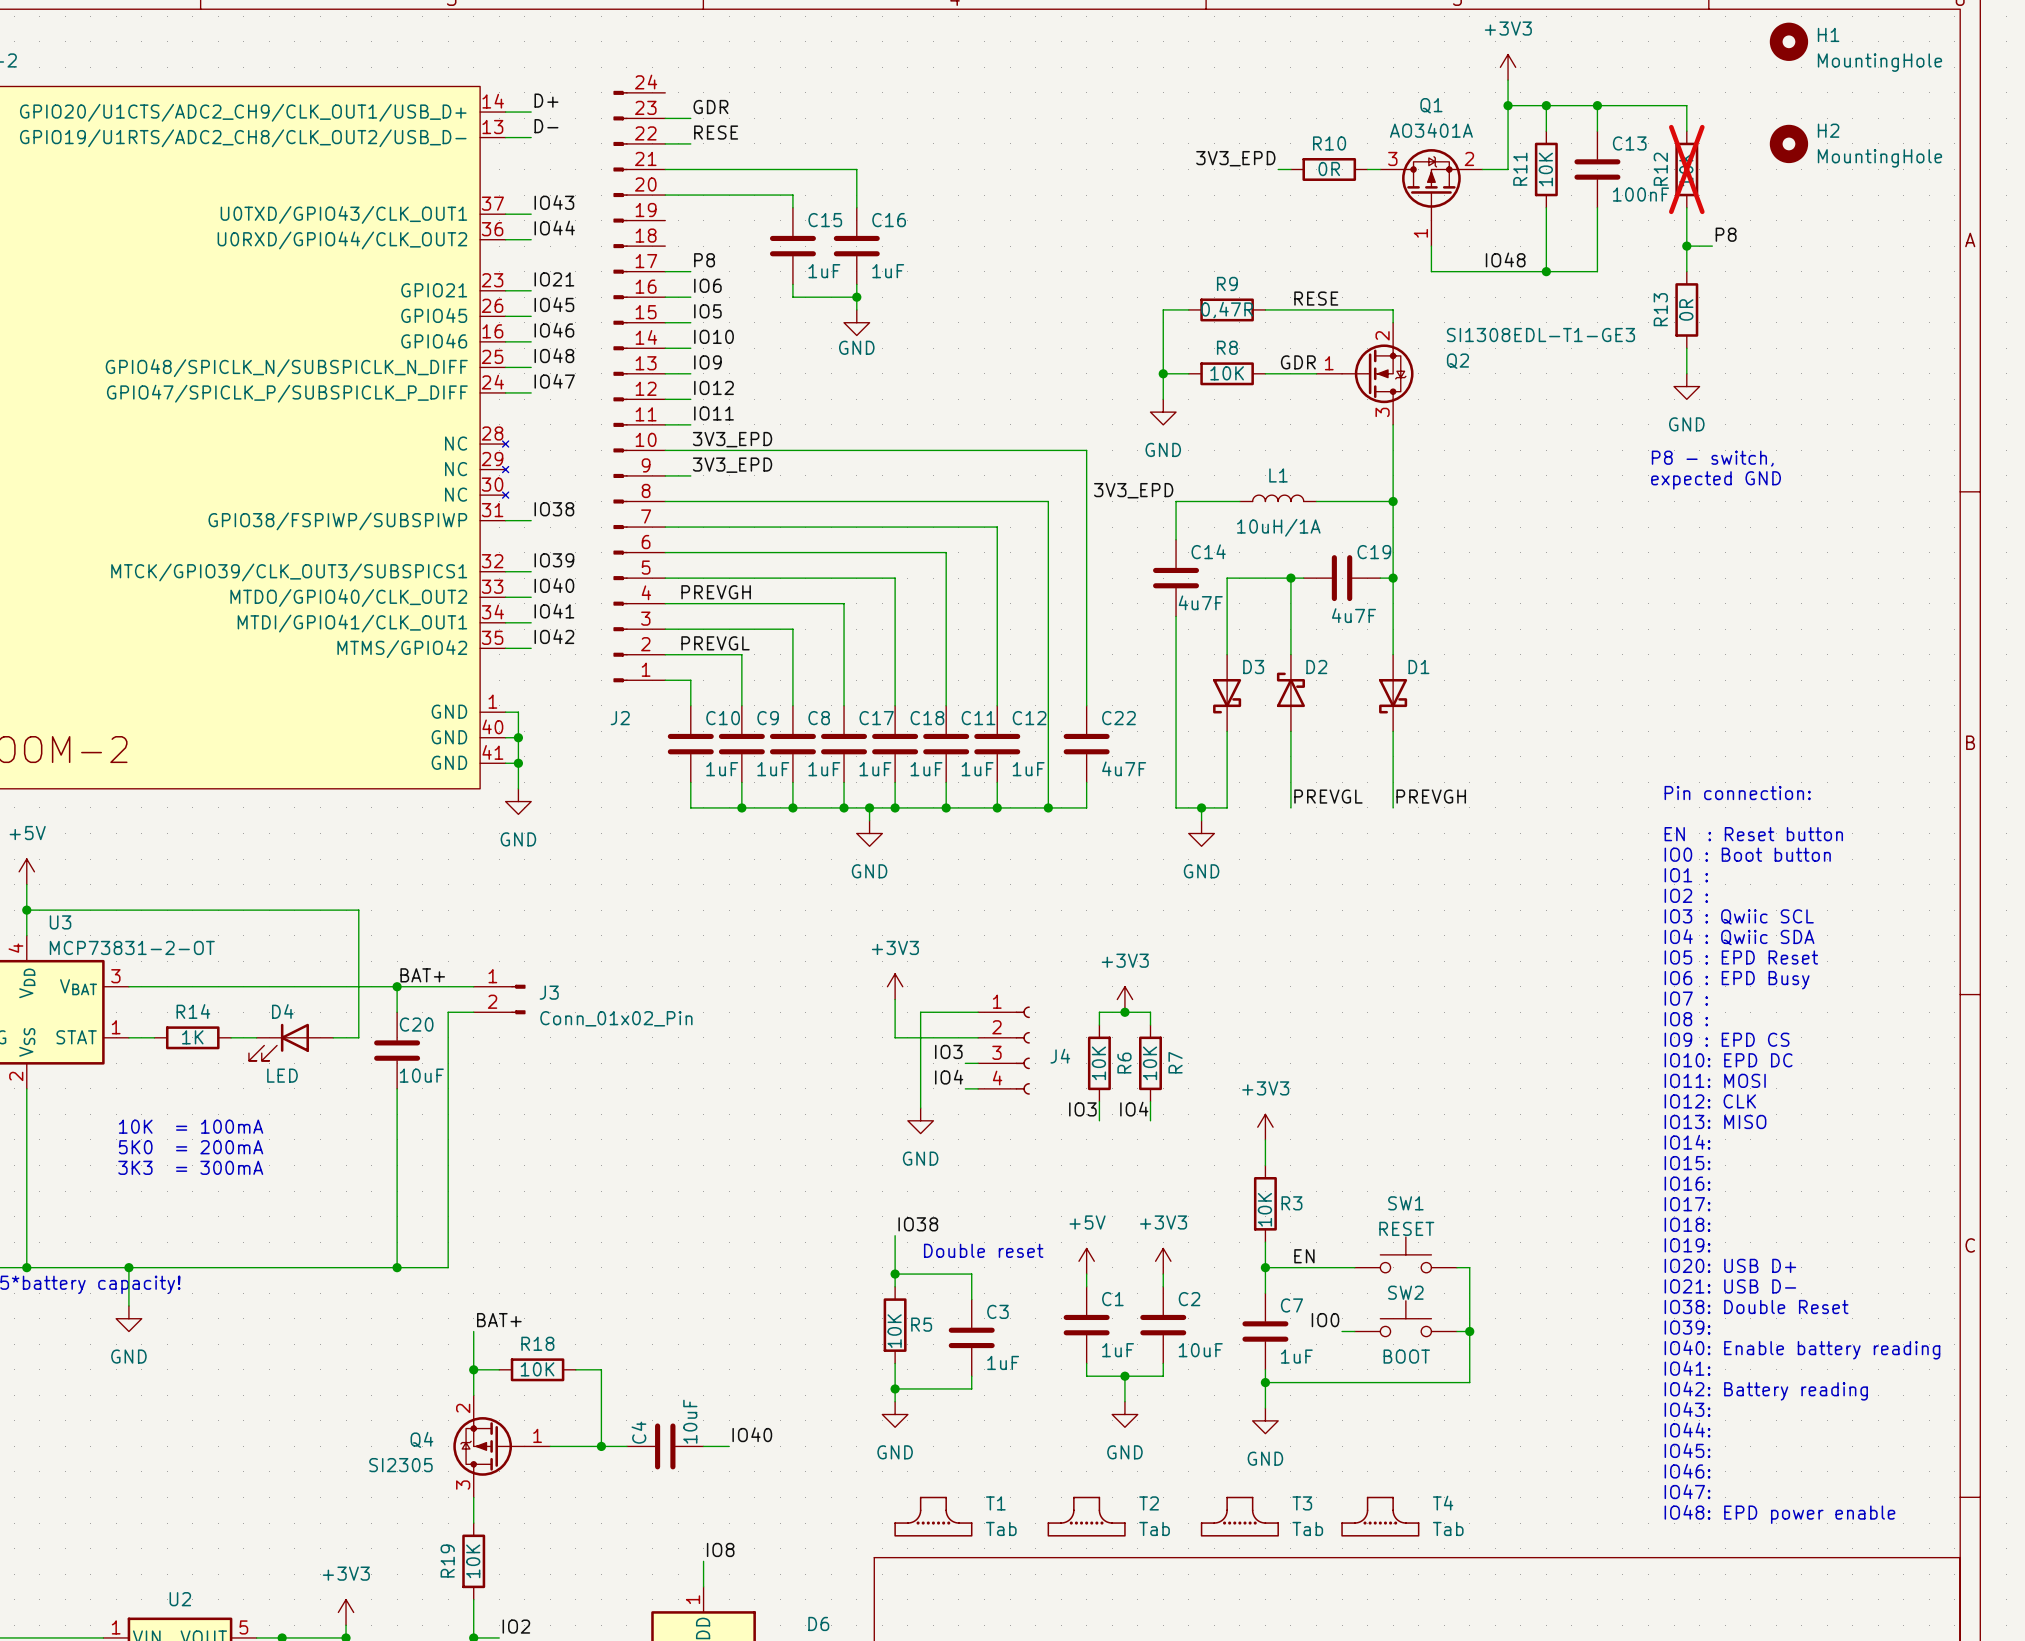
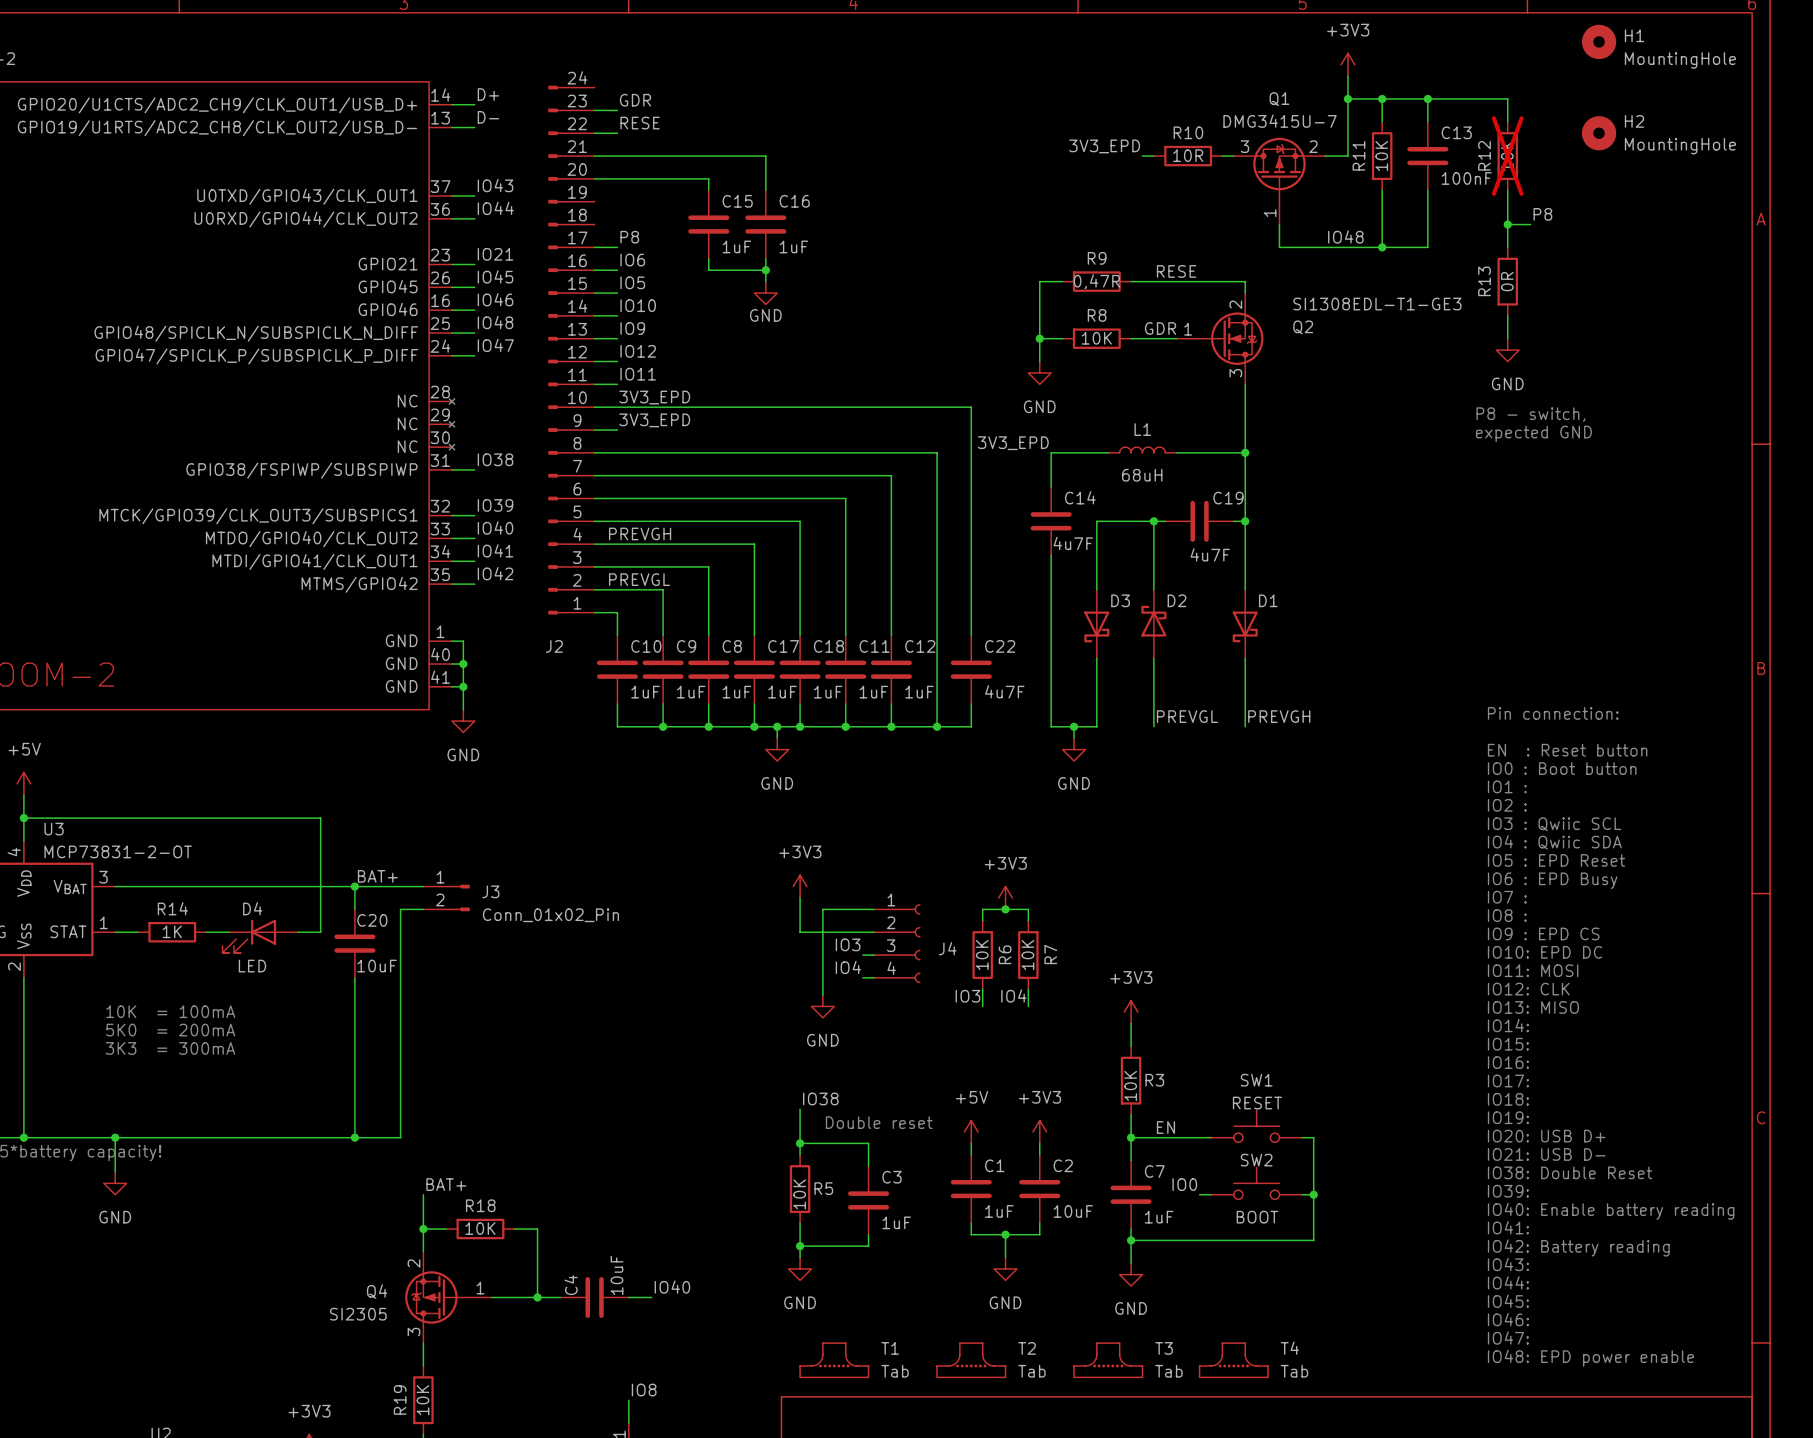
Q1 value: AO3401A (1431, 130) -> DMG3415U-7 (1280, 121)
R10 value: 0R (1329, 169) -> 10R (1188, 155)
L1 value: 10uH/1A (1278, 527) -> 68uH (1142, 475)

